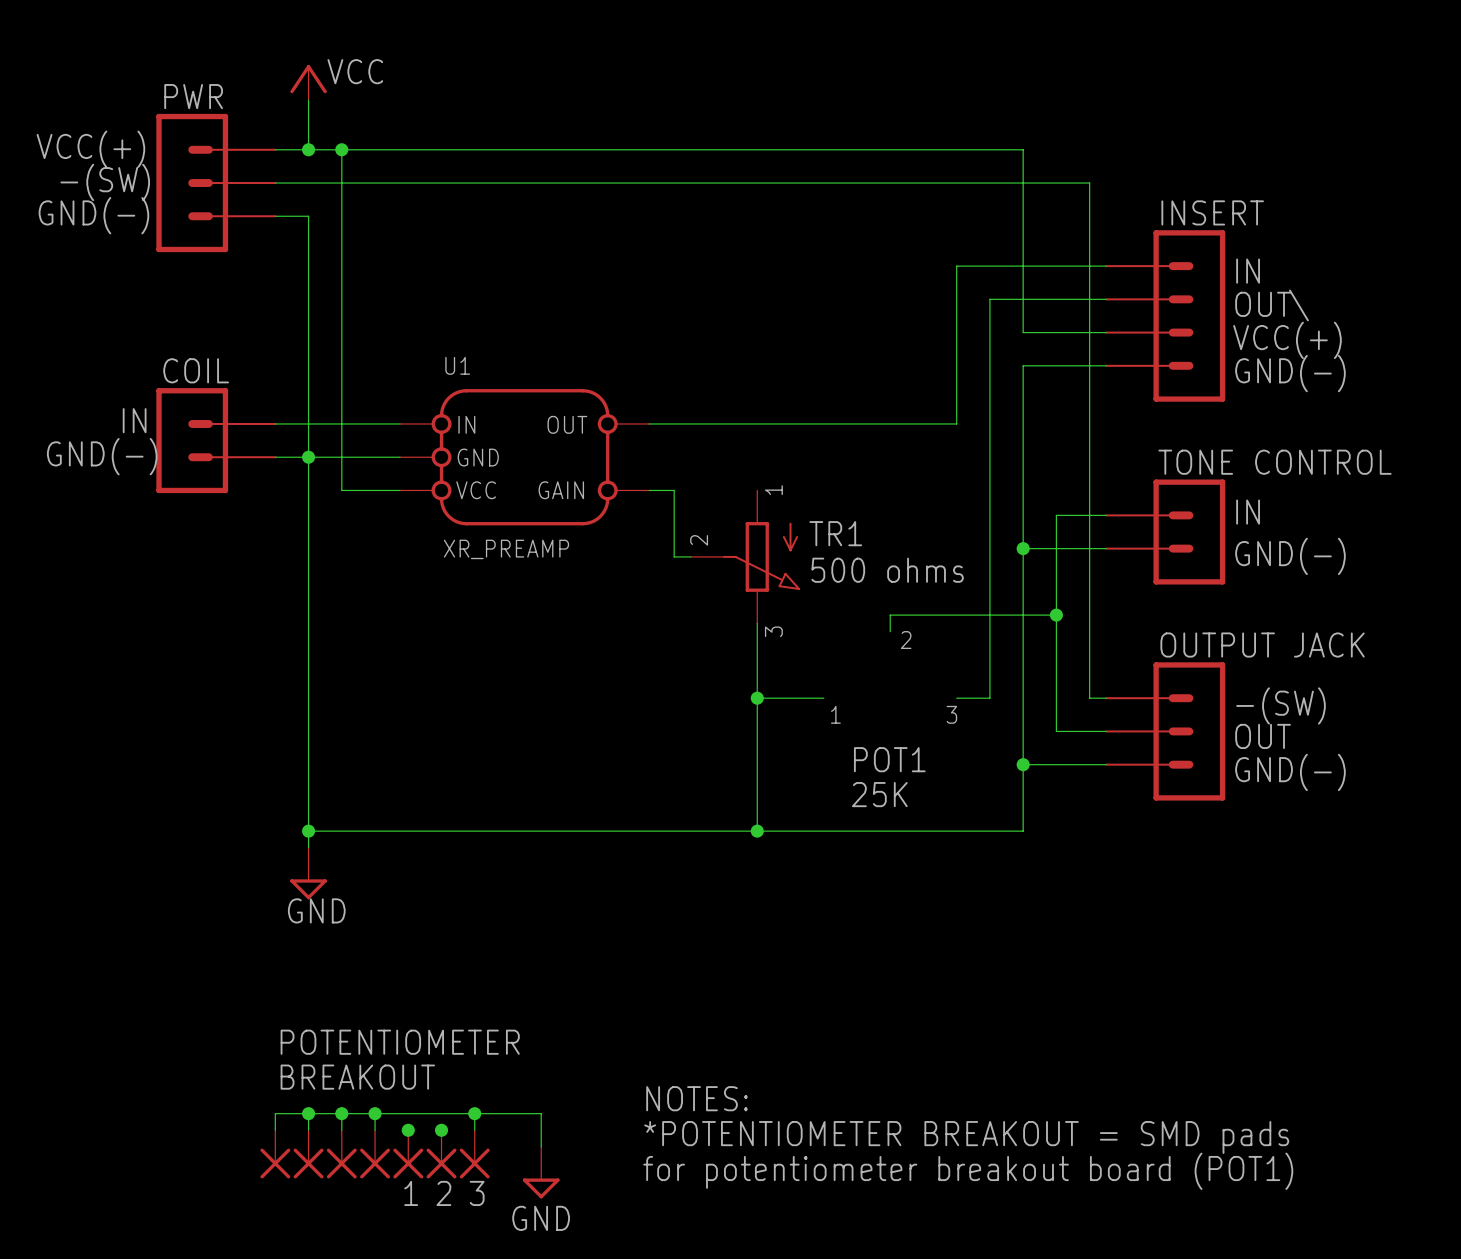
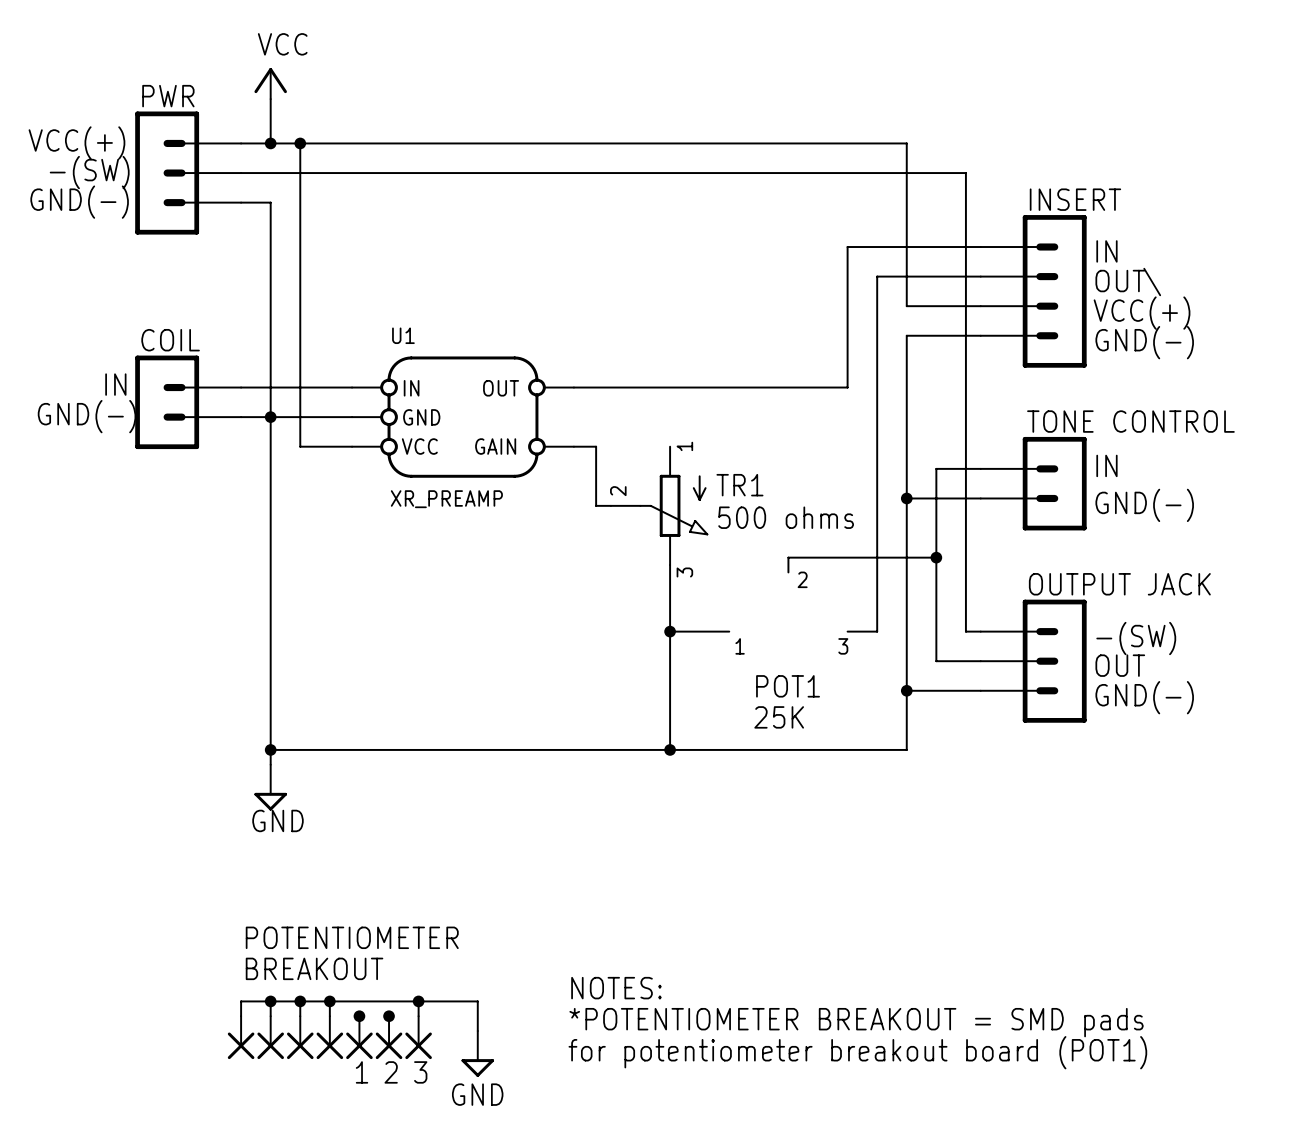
power symbol text position: VCC (355, 71) -> VCC (282, 44)

